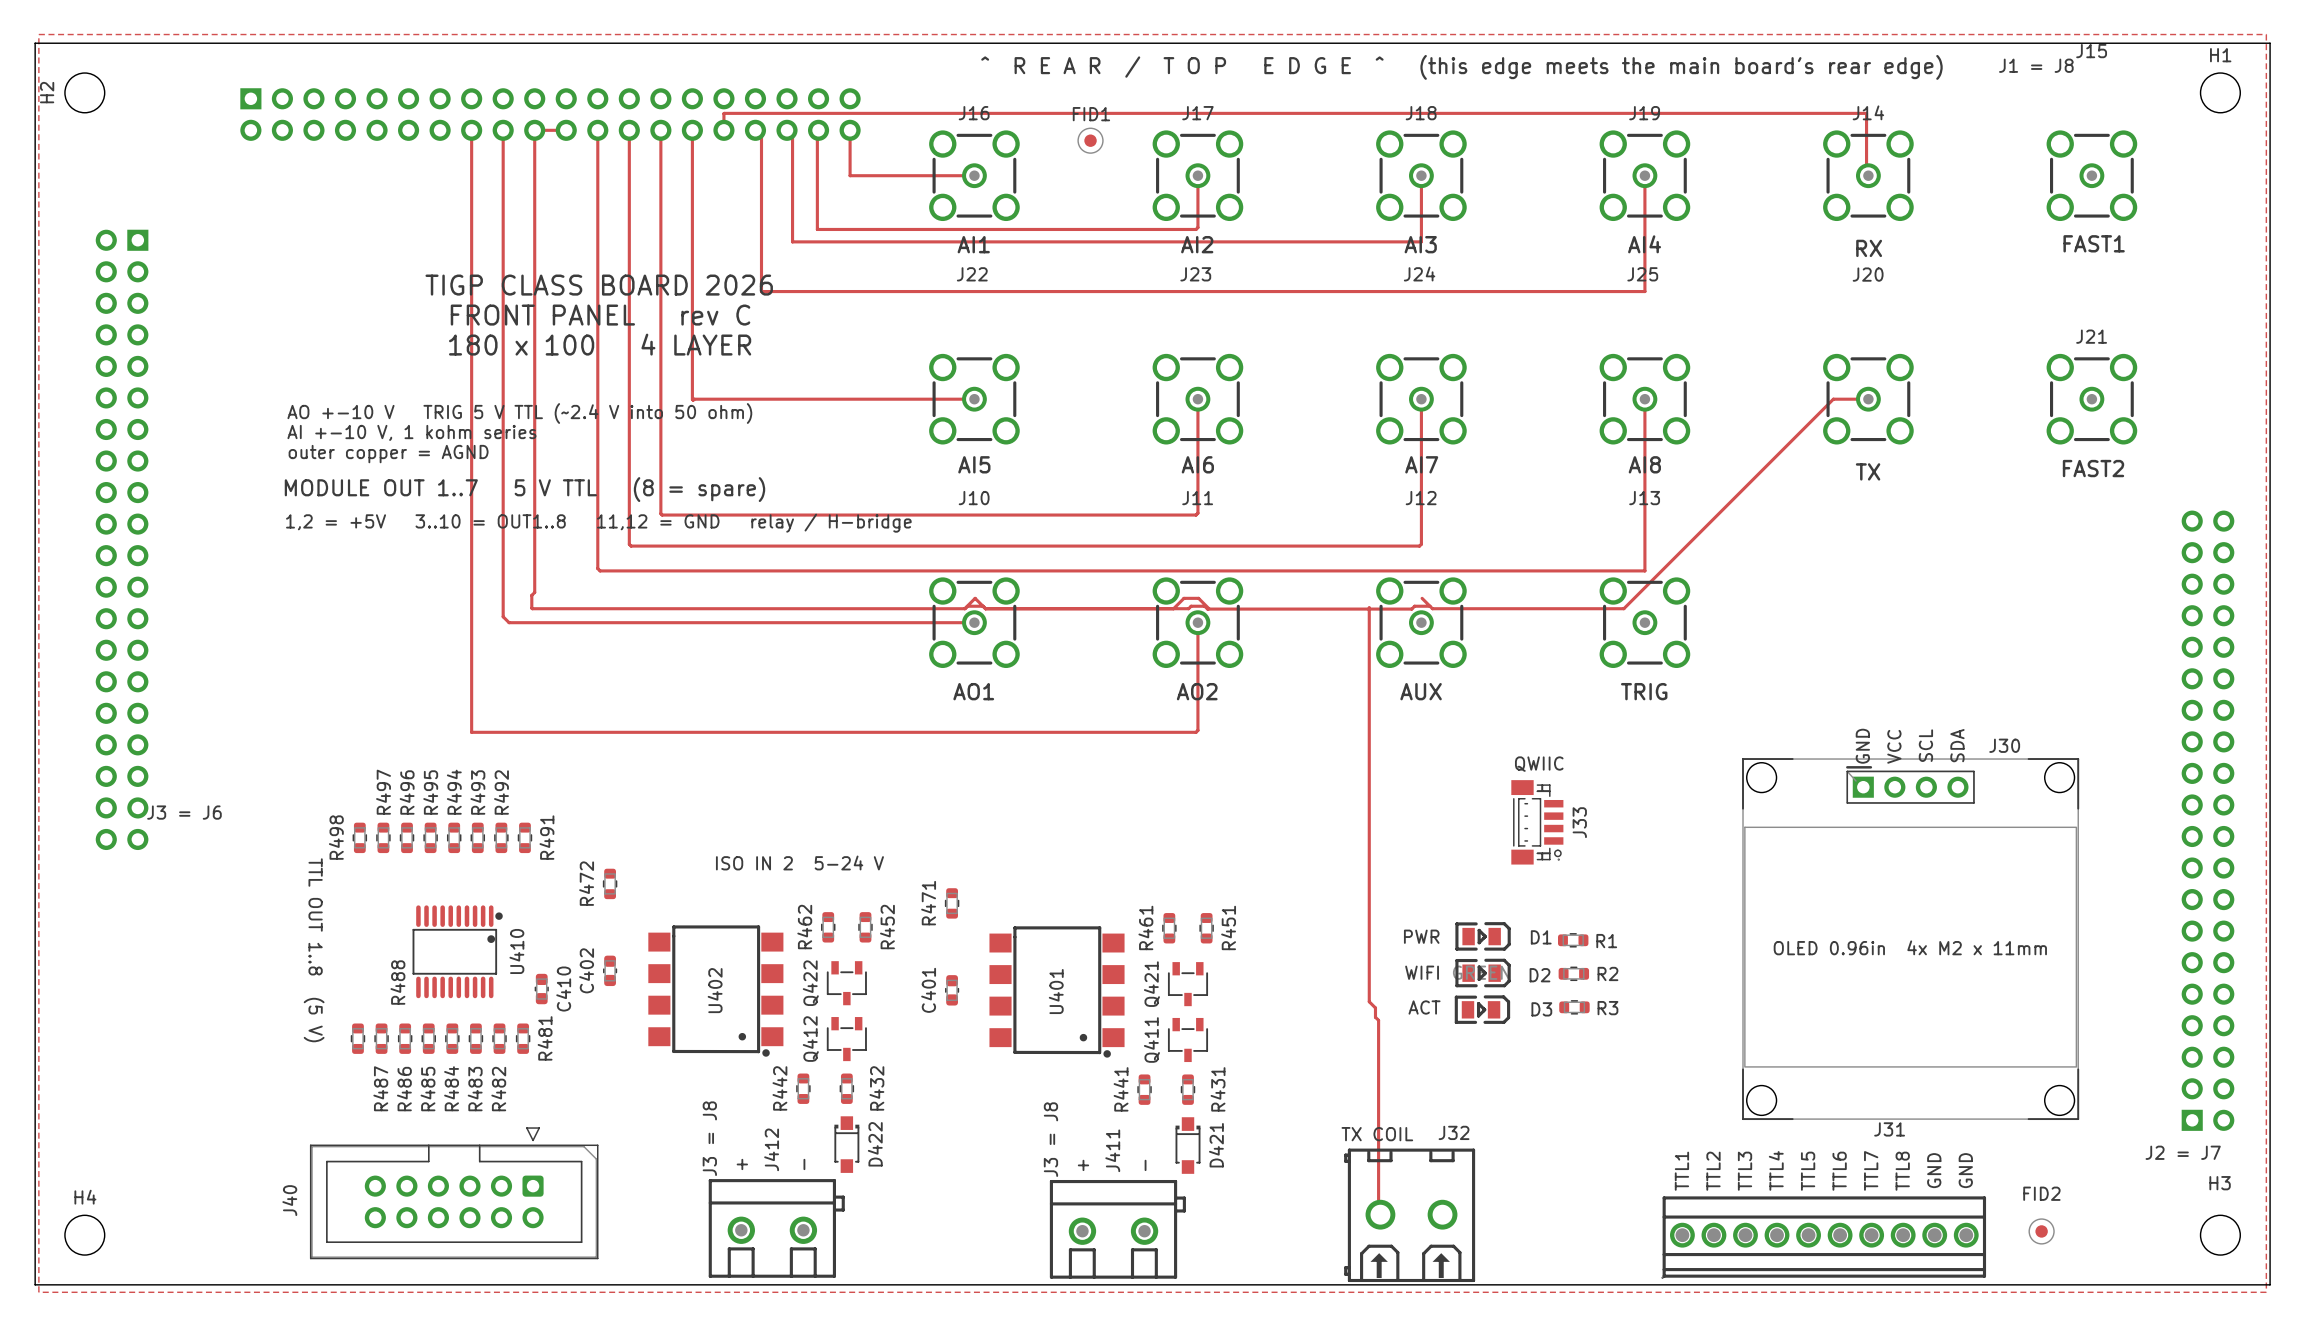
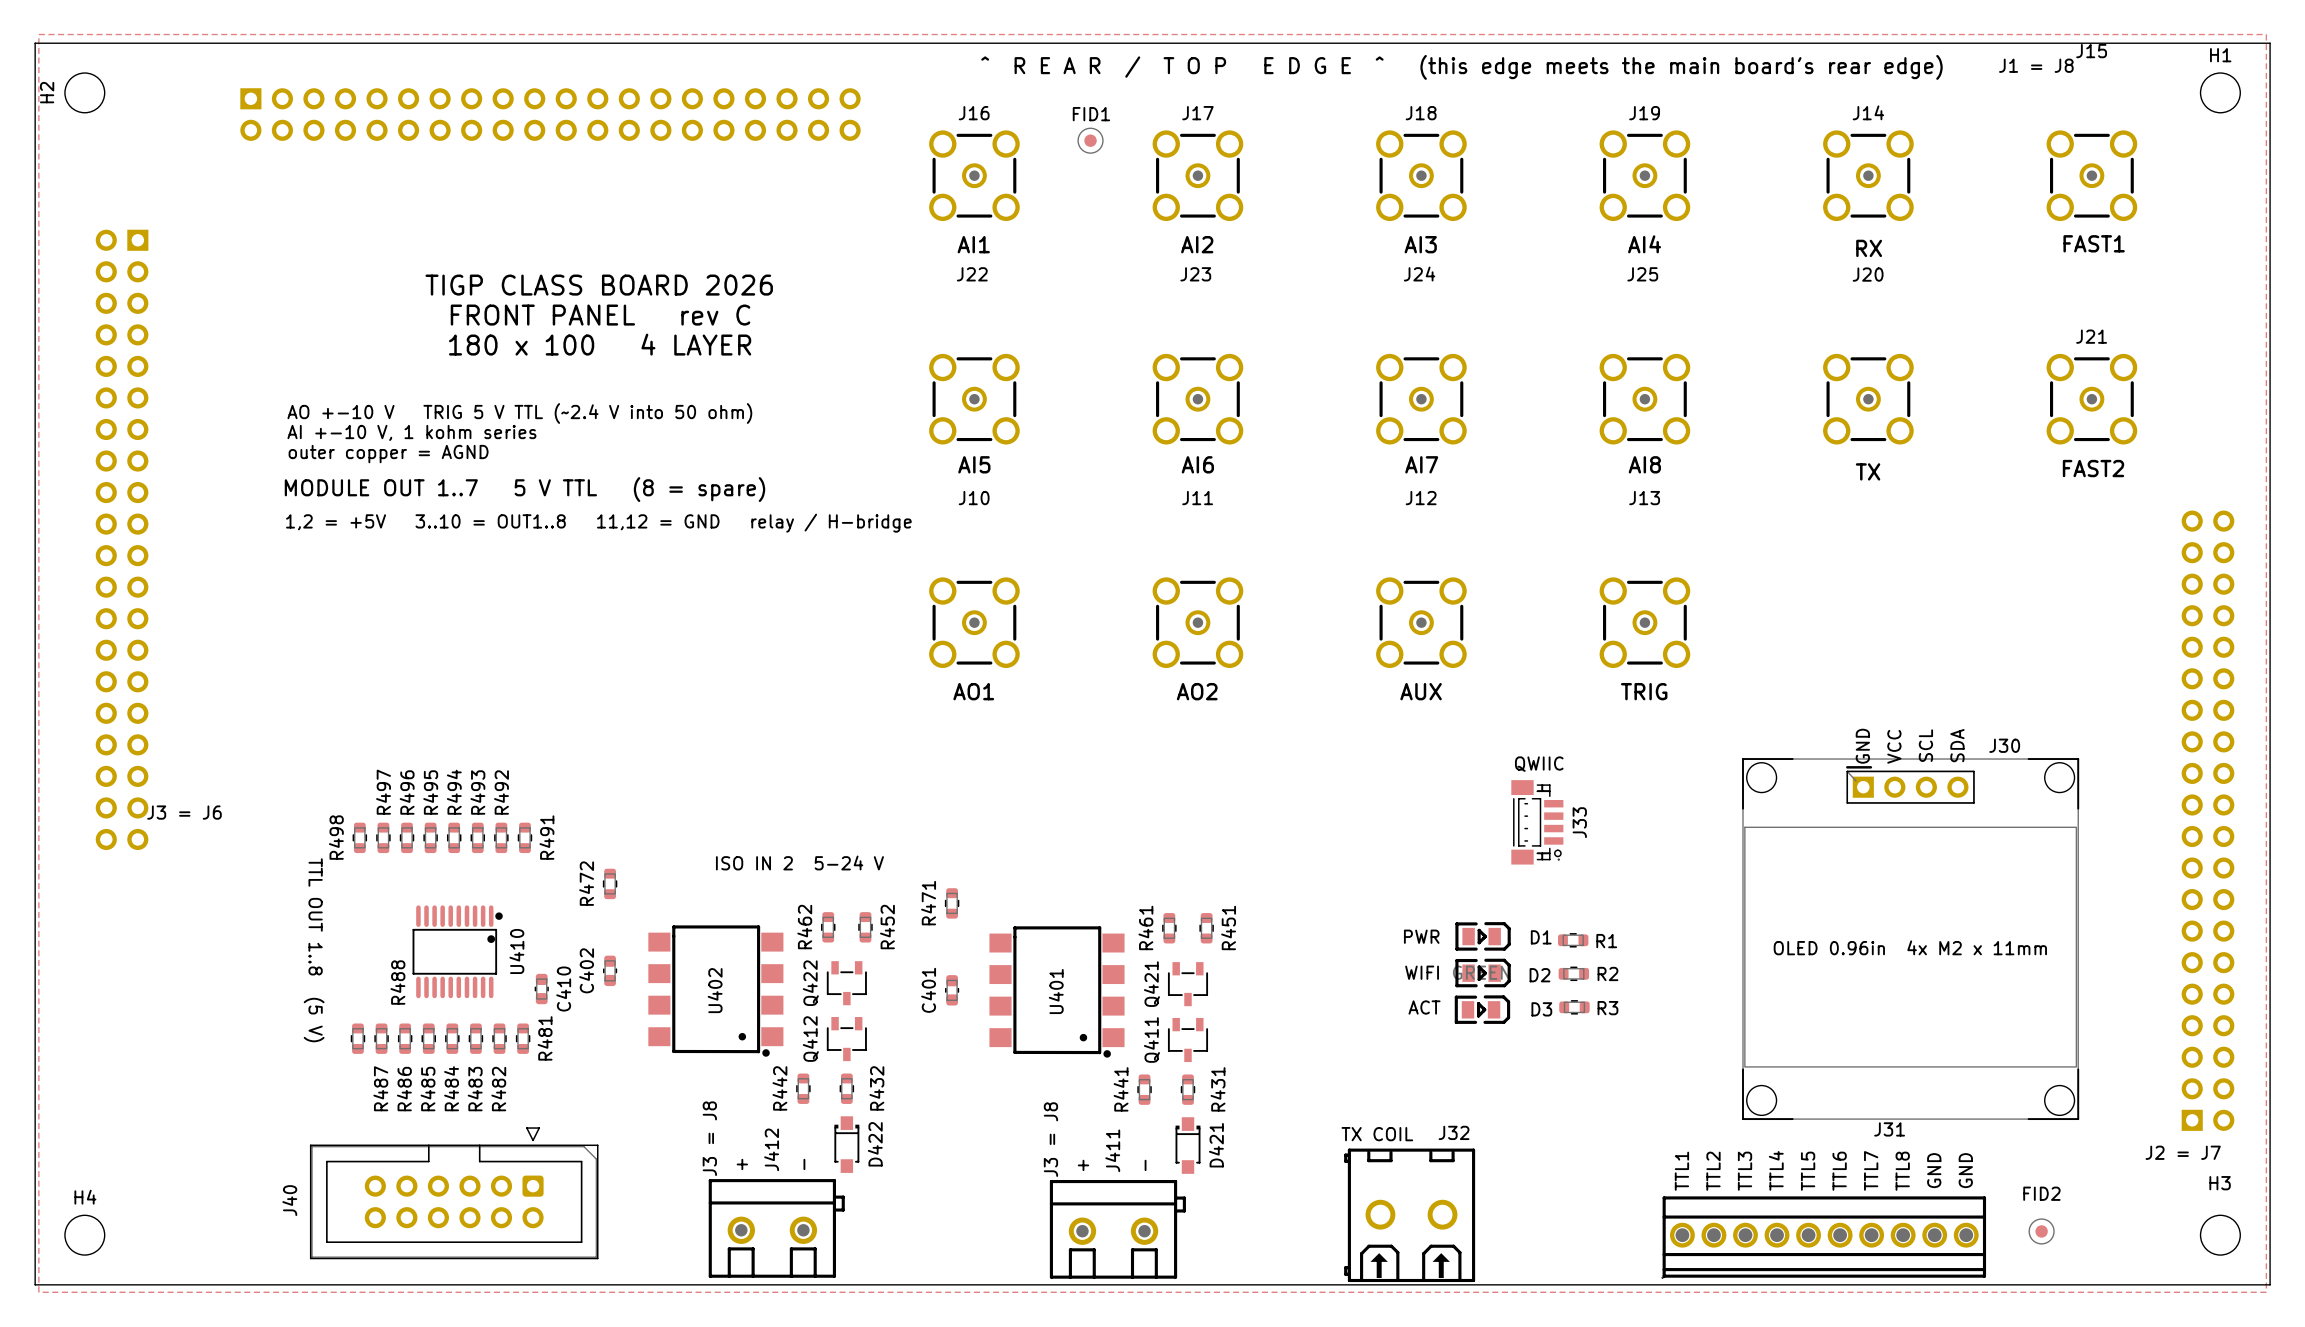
track: (471, 130) (471, 732) (1196, 732) (1197, 730) (1197, 622) -> none
track: (503, 130) (503, 616) (509, 622) (974, 622) -> none
track: (566, 130) (534, 130) (534, 592) (531, 595) (532, 608) (964, 608) (975, 598) (985, 608) (1188, 608) (1191, 606) (1204, 606) (1207, 609) (1411, 609) (1414, 606) (1429, 606) -> none
track: (597, 130) (597, 568) (600, 570) (1644, 570) (1644, 399) -> none
track: (629, 130) (629, 544) (631, 546) (1419, 546) (1421, 544) (1421, 399) -> none
track: (660, 130) (662, 515) (1196, 515) (1197, 513) (1197, 399) -> none
track: (692, 130) (693, 400) (974, 399) -> none
track: (723, 130) (724, 113) (1866, 113) (1866, 173) (1868, 175) -> none
track: (755, 130) (761, 136) (761, 291) (1644, 291) (1644, 175) (1649, 180) -> none
track: (787, 130) (792, 135) (792, 241) (1421, 241) (1421, 175) -> none
track: (818, 130) (817, 229) (1196, 229) (1197, 227) (1197, 175) -> none
track: (850, 130) (850, 175) (974, 175) -> none
track: (1868, 399) (1833, 399) (1623, 608) (1432, 608) (1422, 598) -> none
track: (983, 606) (967, 606) (965, 608) -> none
track: (1369, 607) (1369, 1001) (1375, 1007) (1375, 1017) (1378, 1020) (1378, 1200) -> none
track: (1173, 608) (1183, 598) (1198, 598) (1208, 608) -> none

